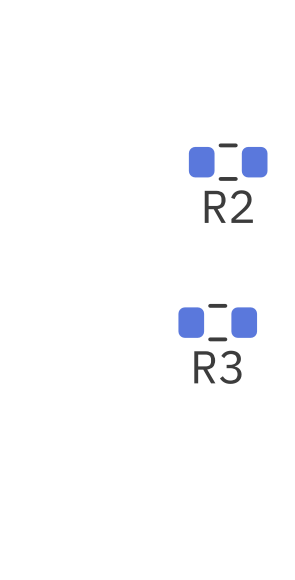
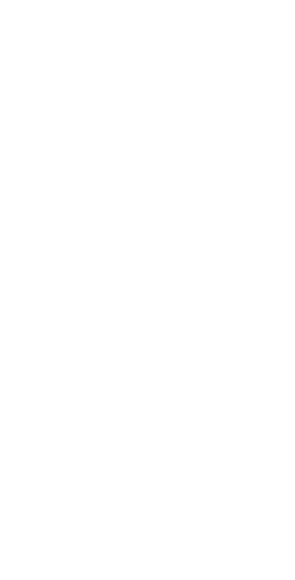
R2: (228, 162) -> none
R3: (217, 322) -> none

